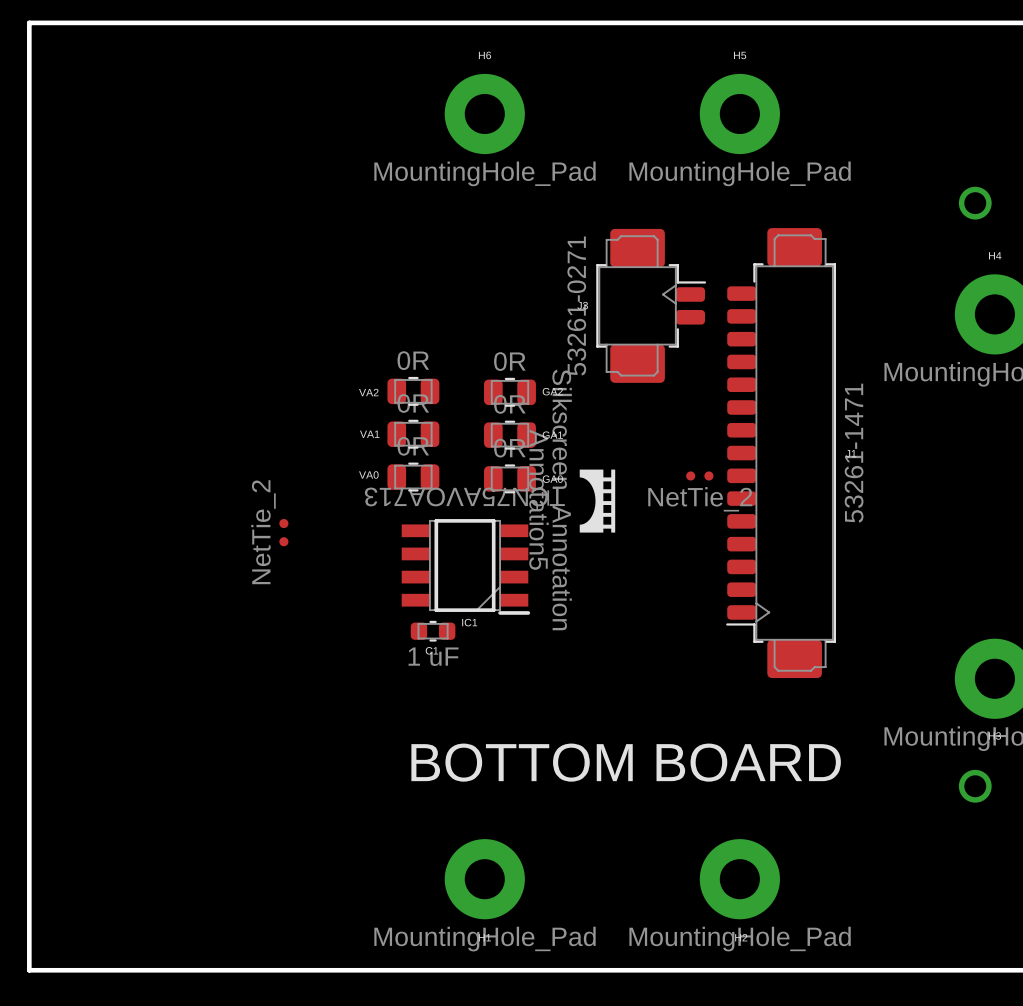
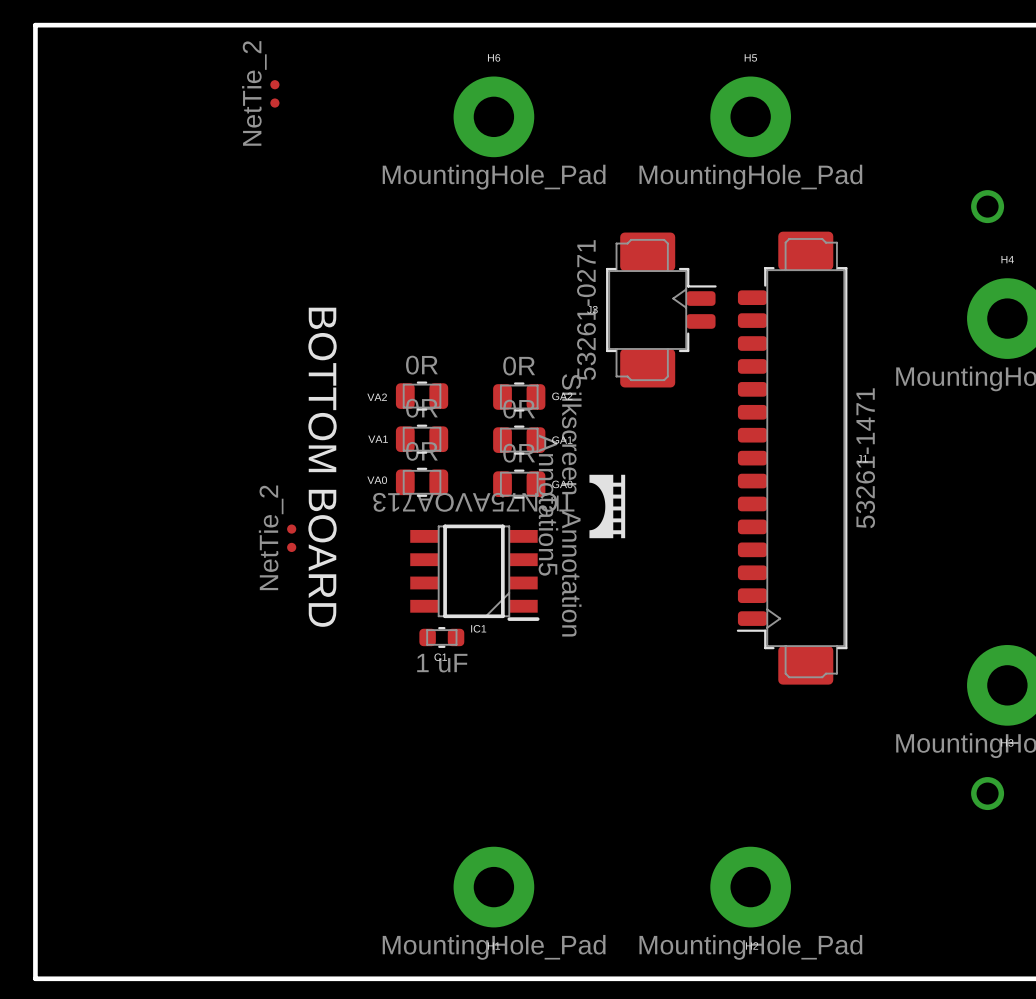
part: none -> NetTie_2 (274, 93)
text: none -> BOTTOM BOARD (322, 467)
part: NetTie_2 (699, 475) -> none
text: BOTTOM BOARD (626, 762) -> none

